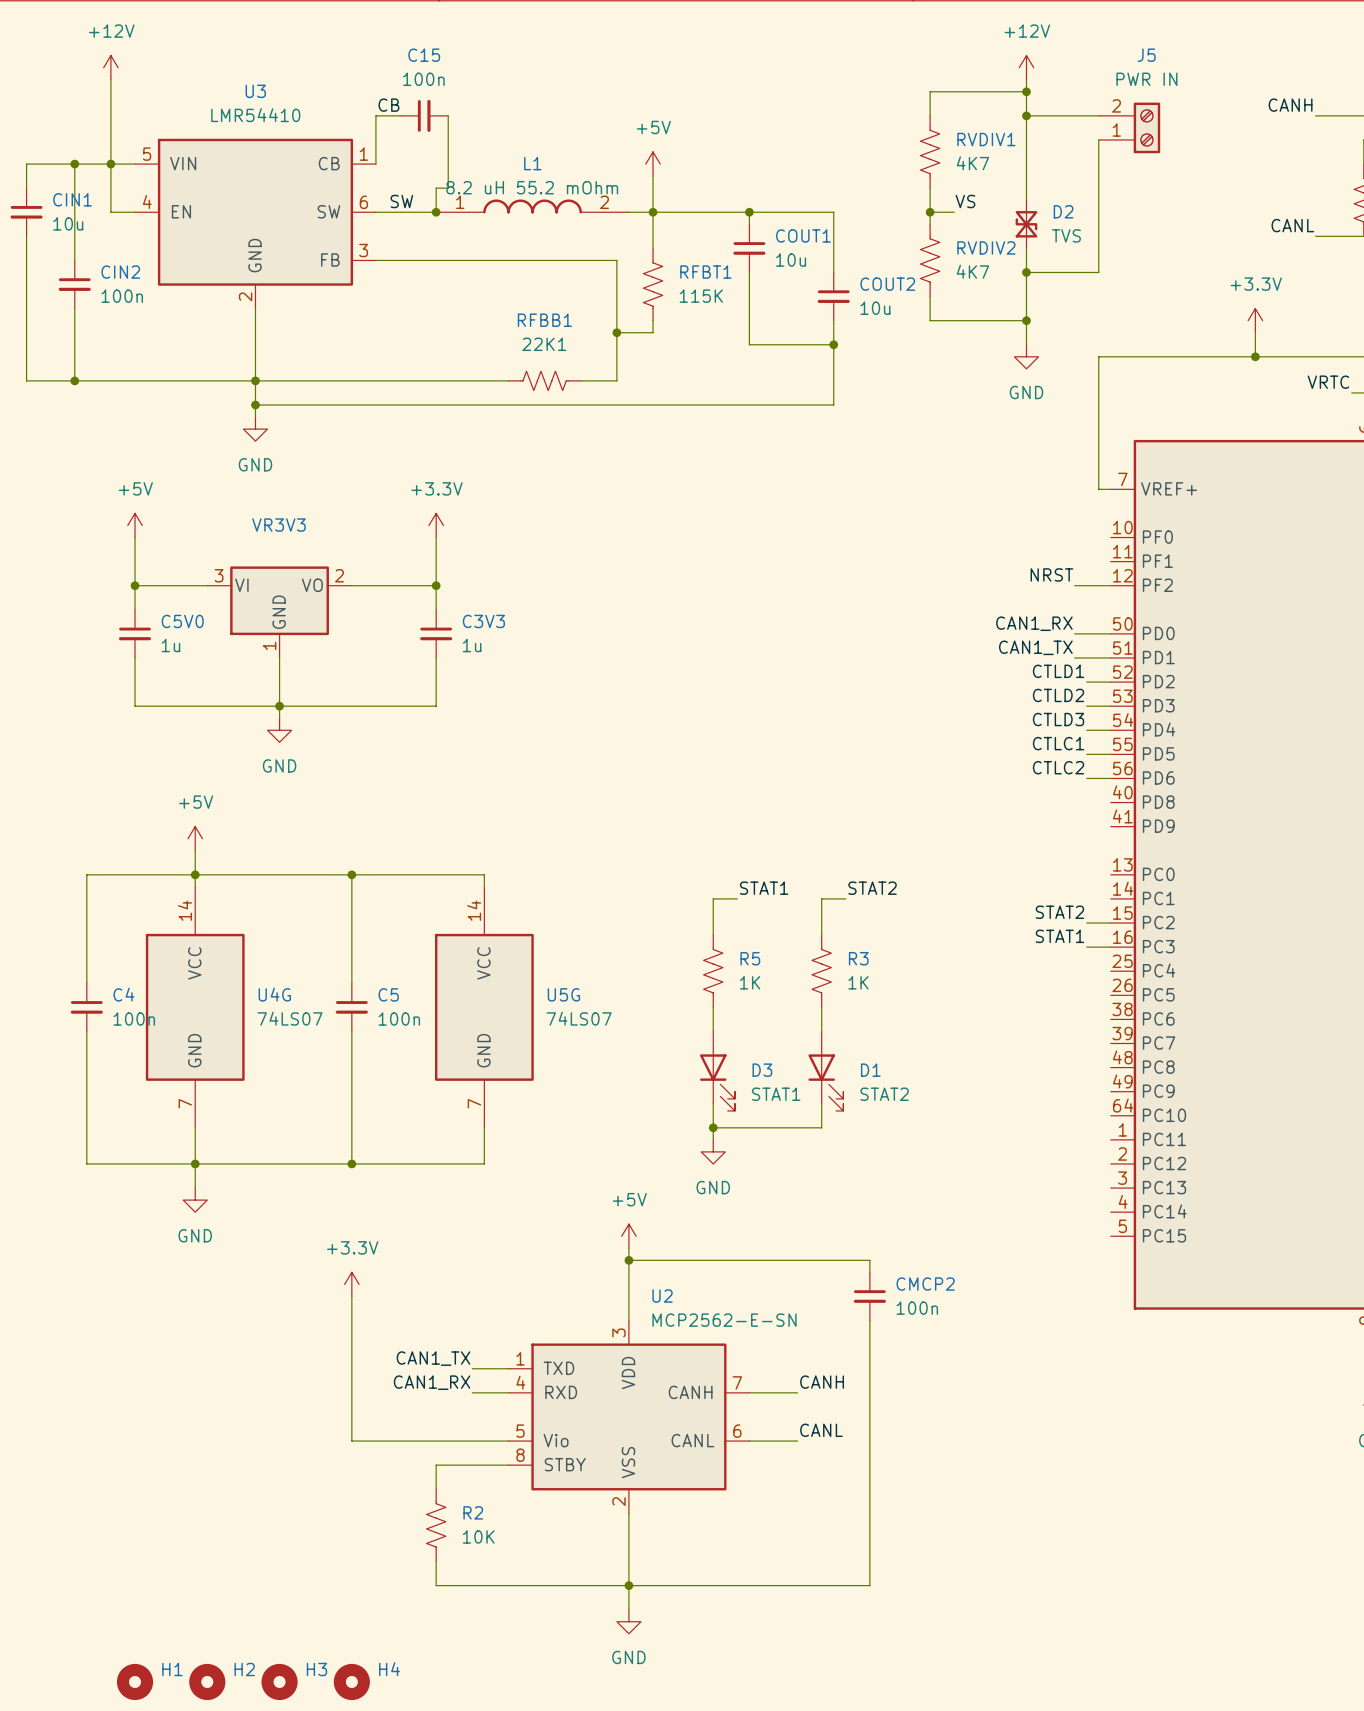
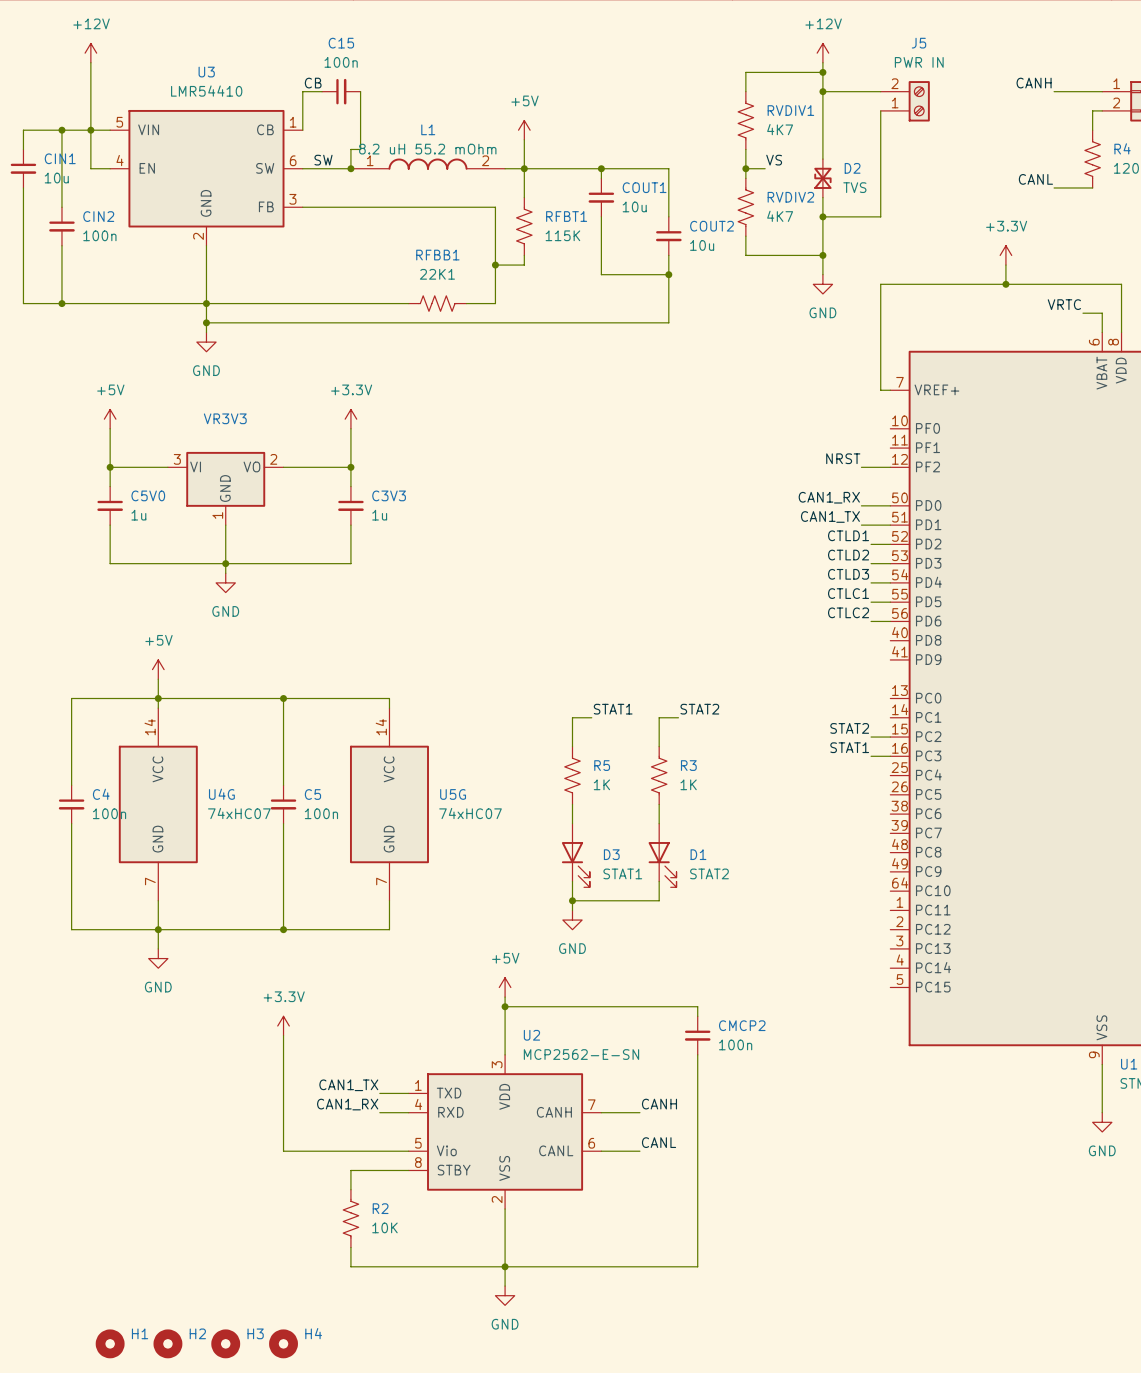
U4G value: 74LS07 (289, 1018) -> 74xHC07 (239, 813)
U5G value: 74LS07 (579, 1018) -> 74xHC07 (470, 813)

